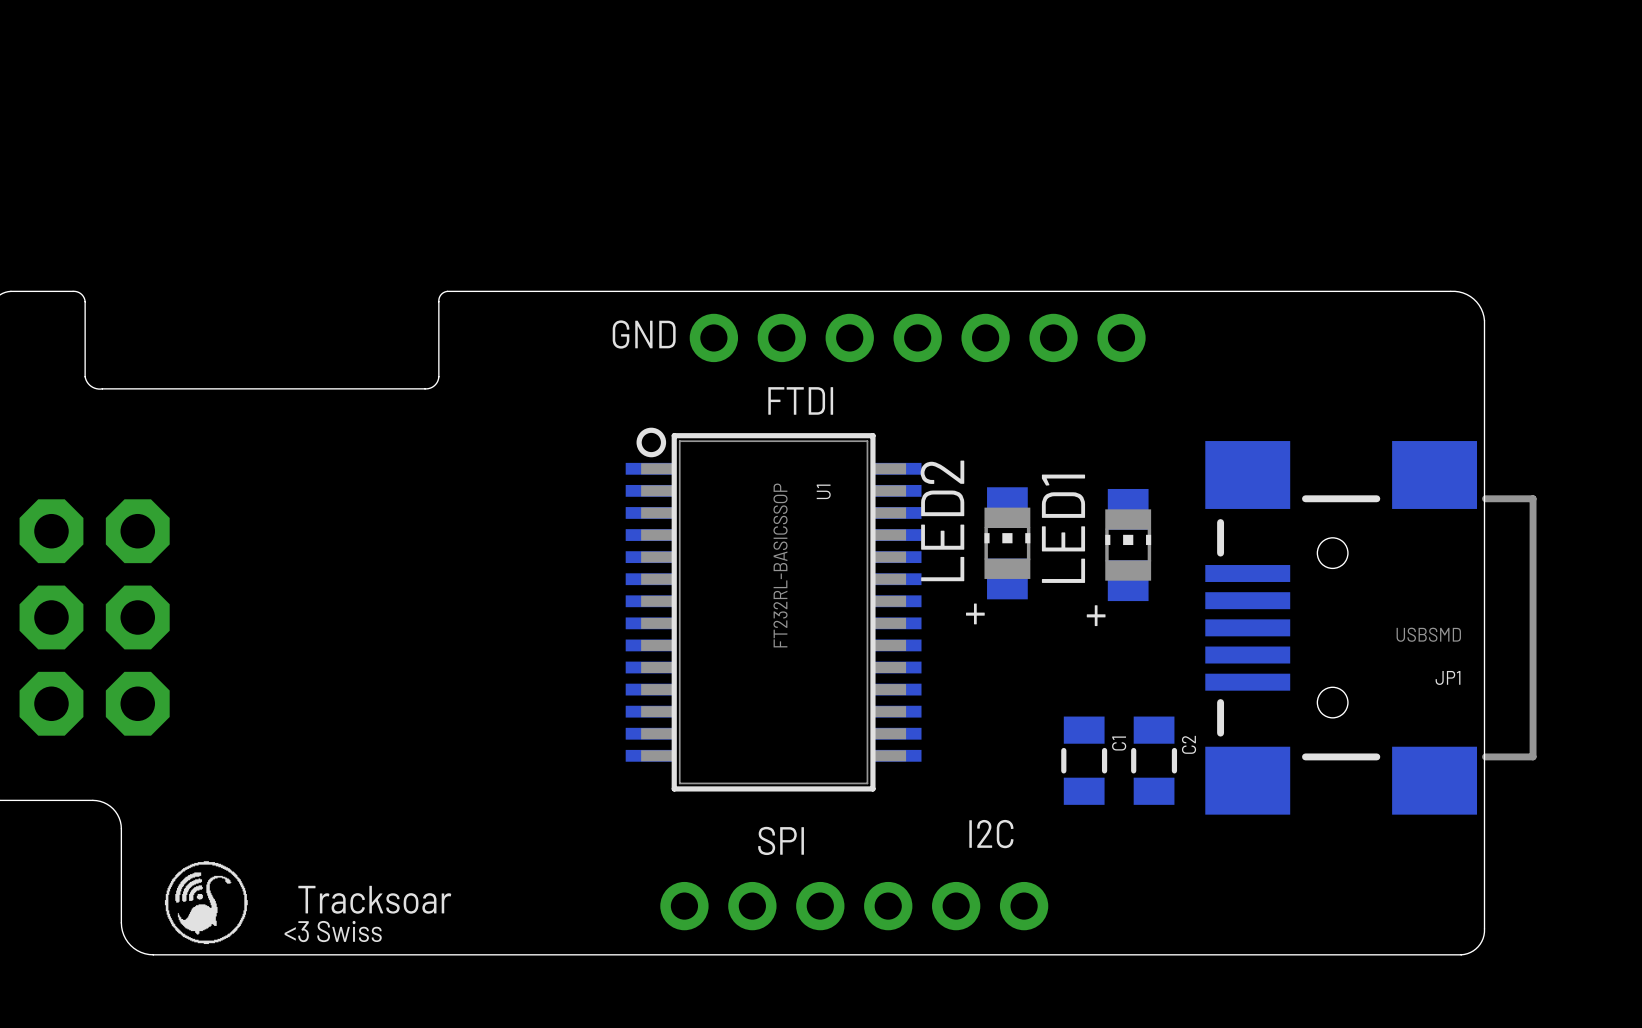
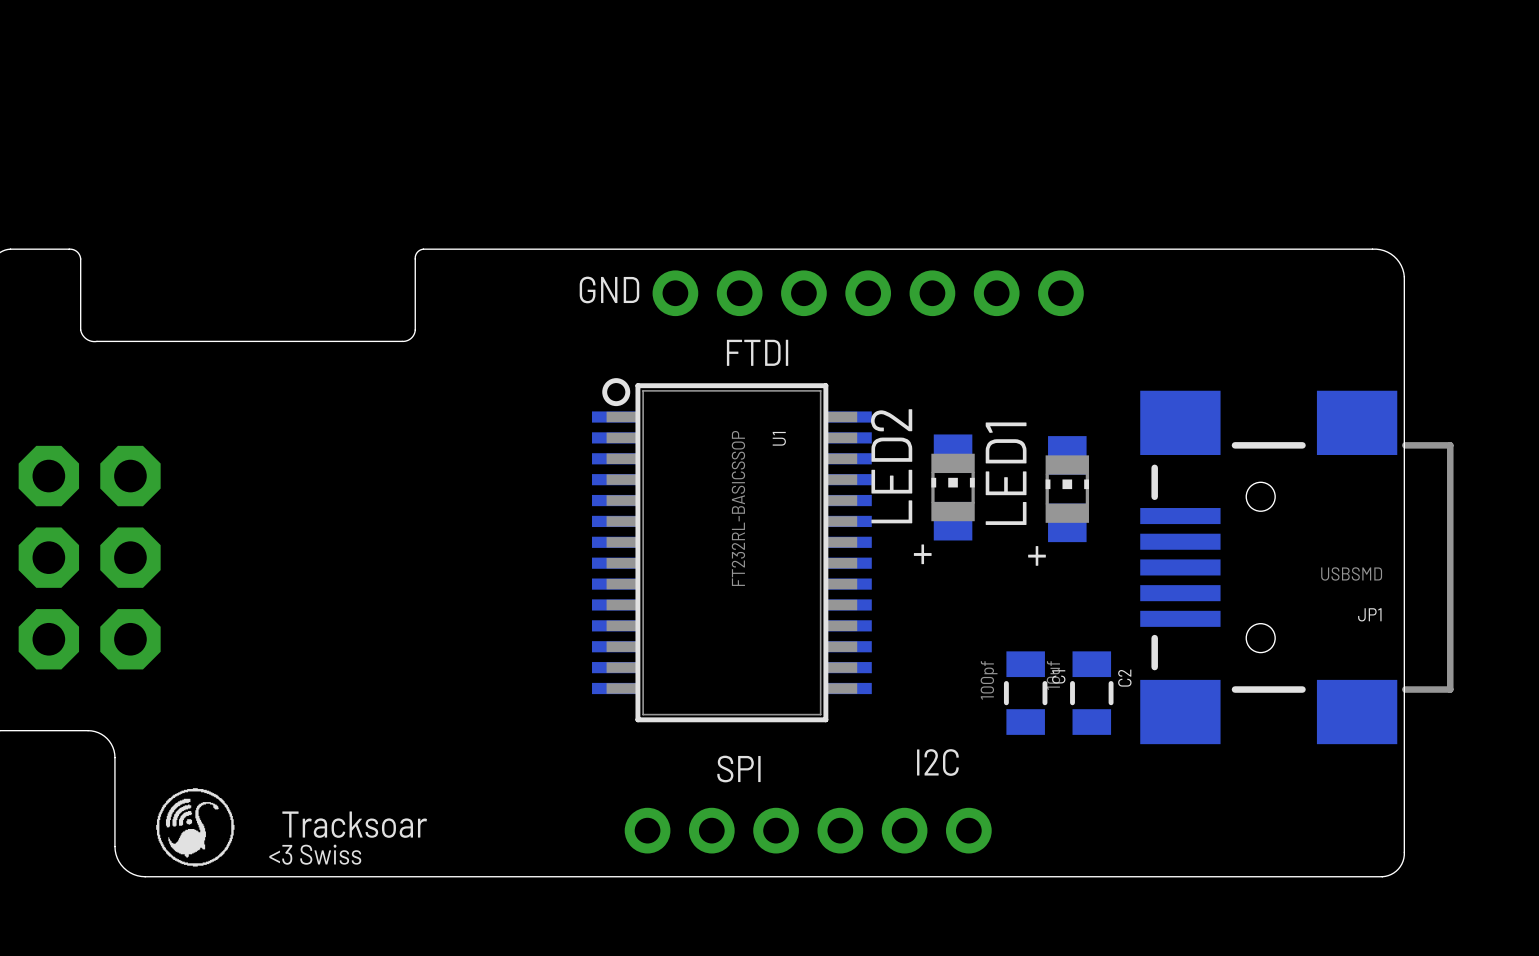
C2 value: none -> 10uf (1053, 675)
C1 value: none -> 100pf (989, 680)

